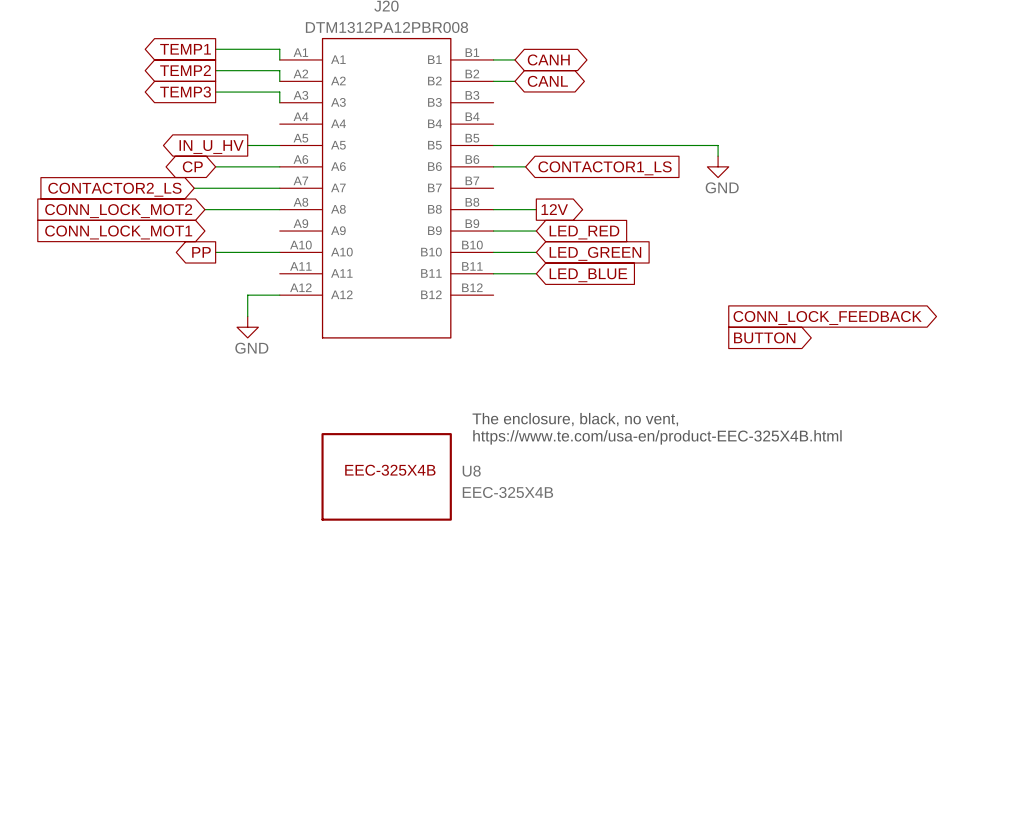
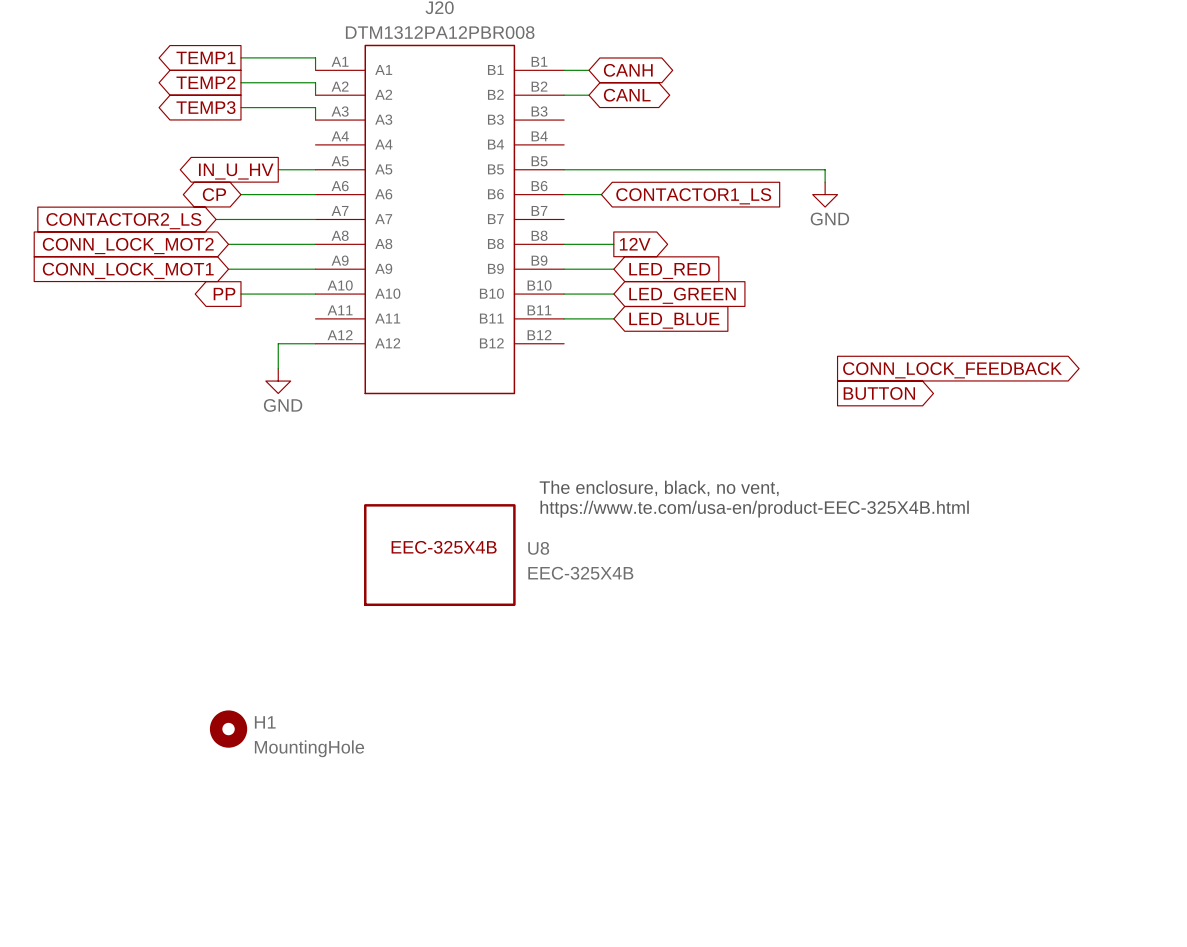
wire: none -> (228, 269) (315, 269)
H1: none -> MountingHole (228, 729)

